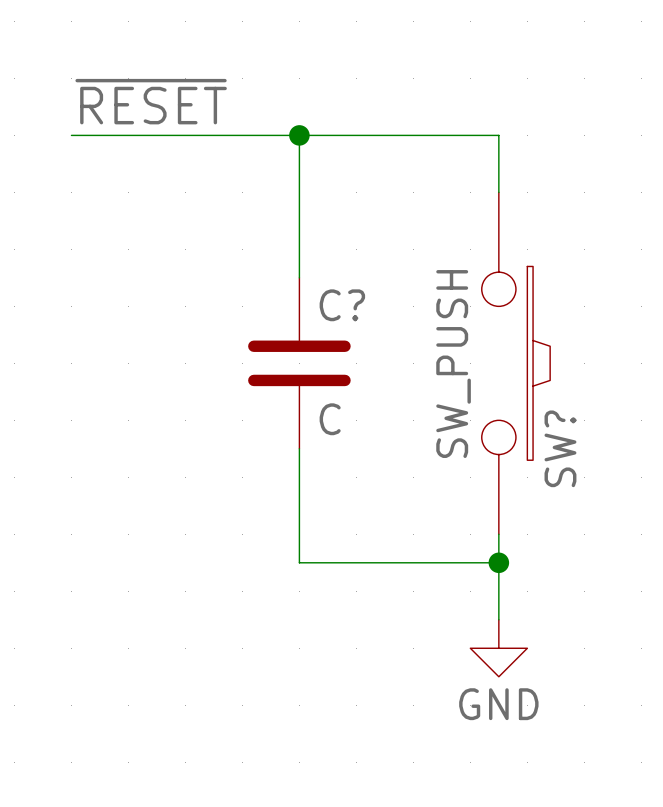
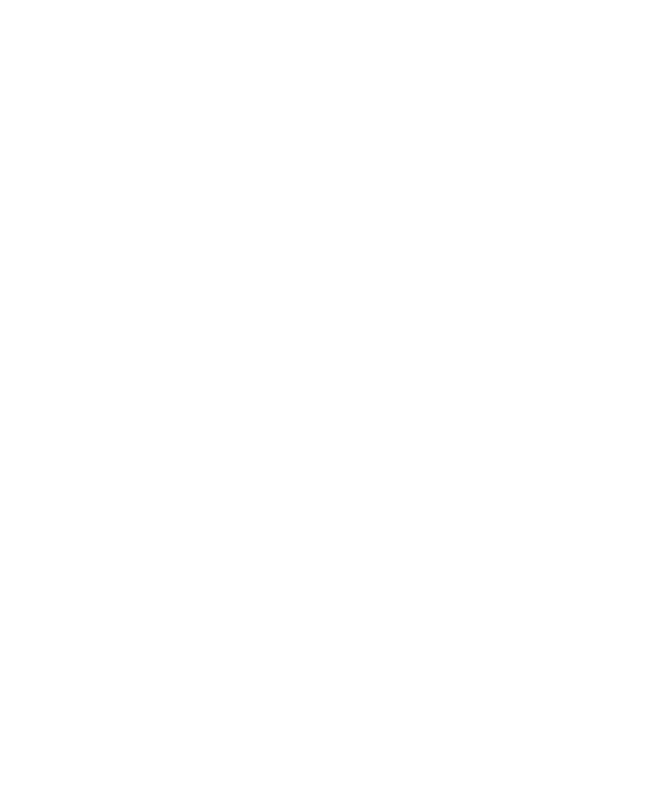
label: ~{RESET} (151, 101) -> none
wire: (71, 135) (498, 135) (498, 192) -> none
wire: (299, 135) (299, 277) -> none
junction: (299, 135) -> none
C?: C (299, 363) -> none
SW?: SW_PUSH (515, 363) -> none
wire: (299, 448) (299, 562) (498, 562) -> none
wire: (498, 534) (498, 619) -> none
junction: (498, 562) -> none
power symbol: GND (498, 648) -> none

